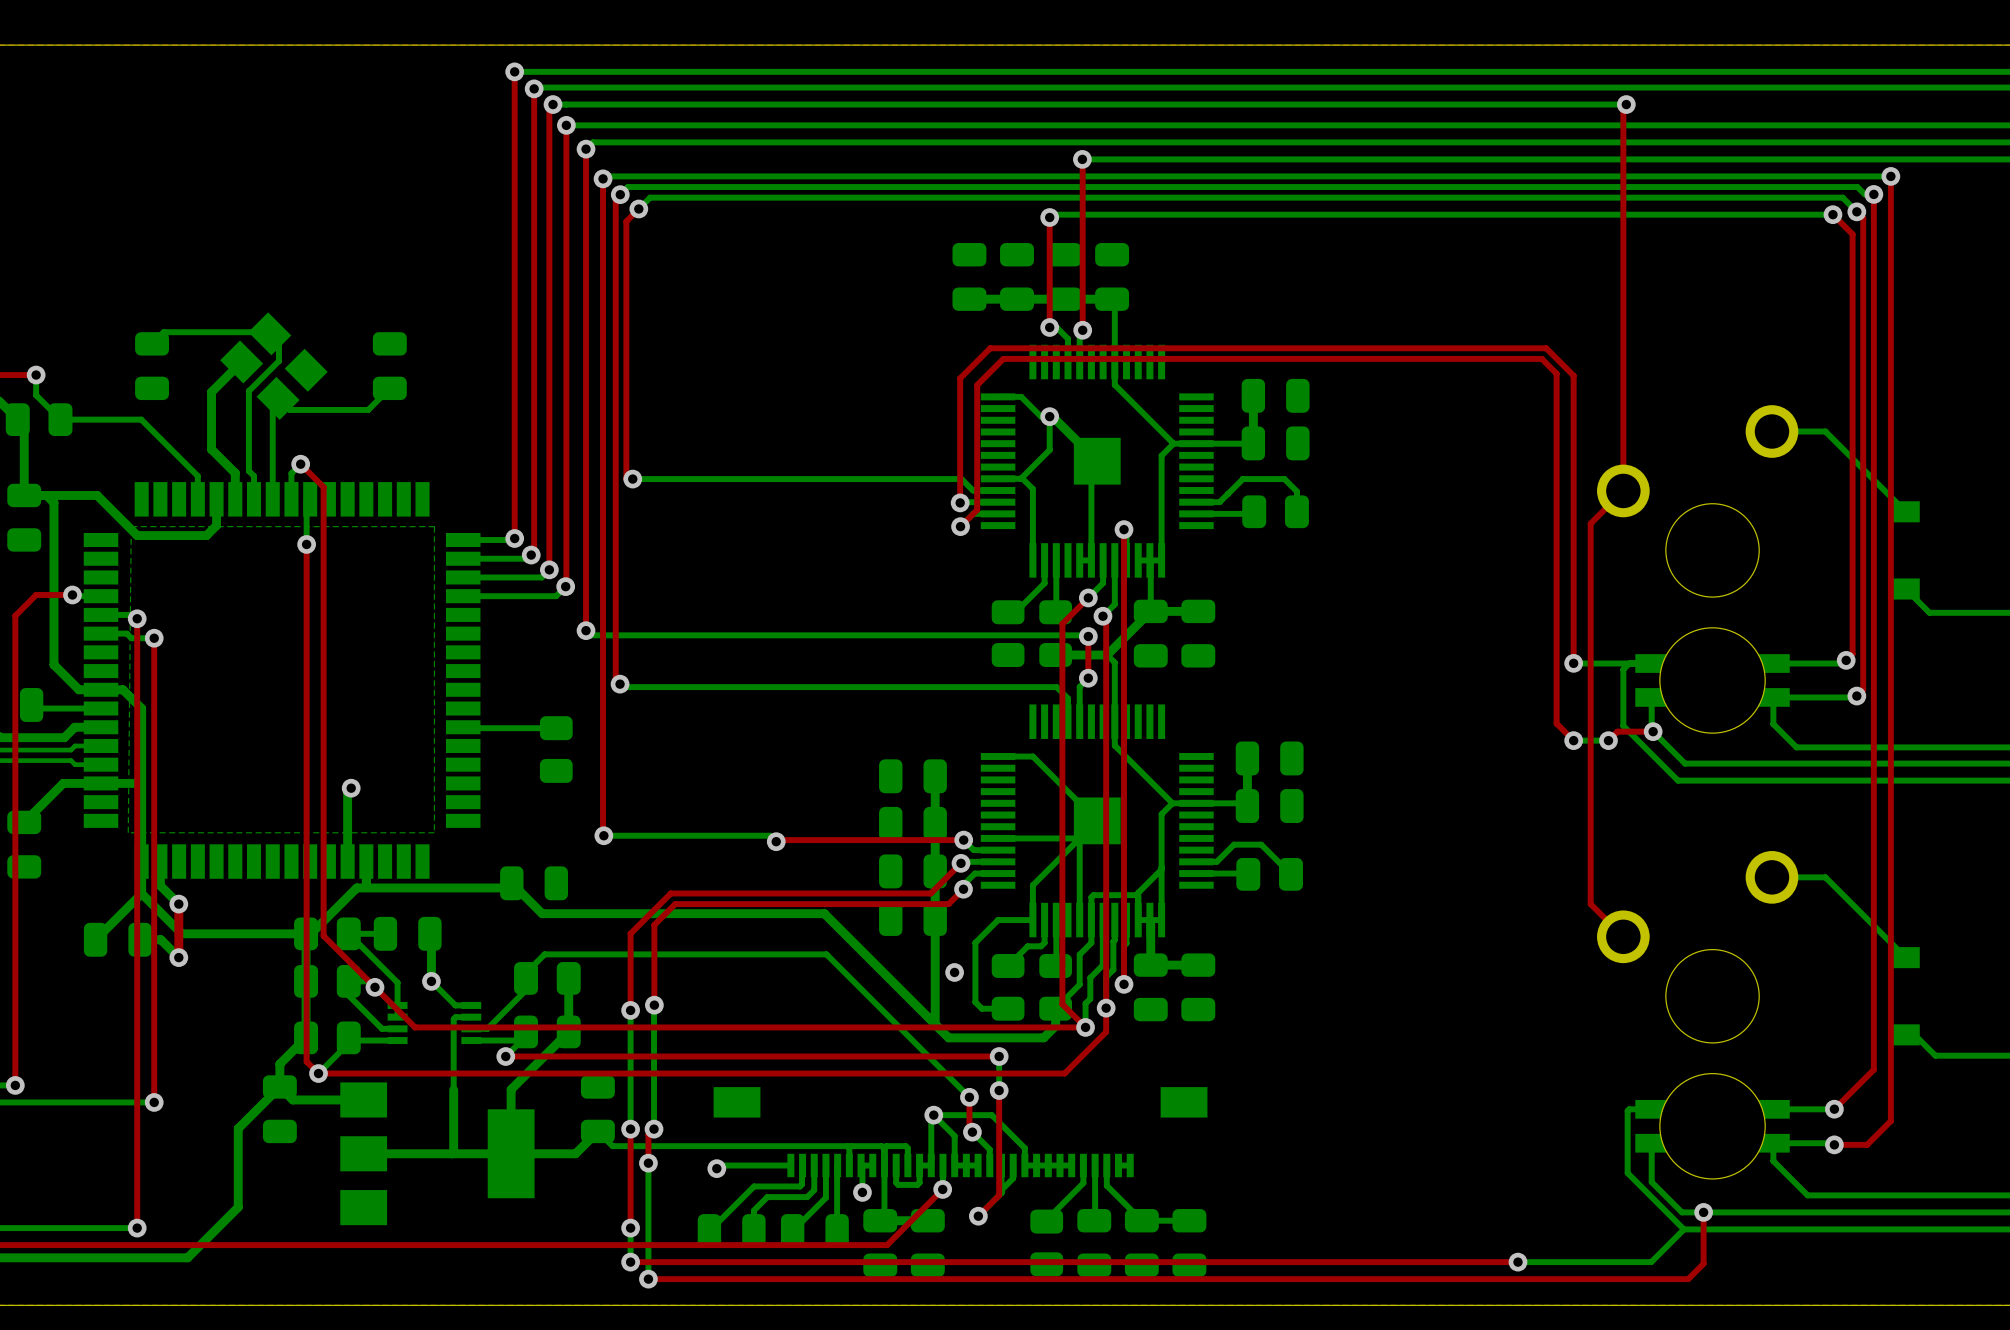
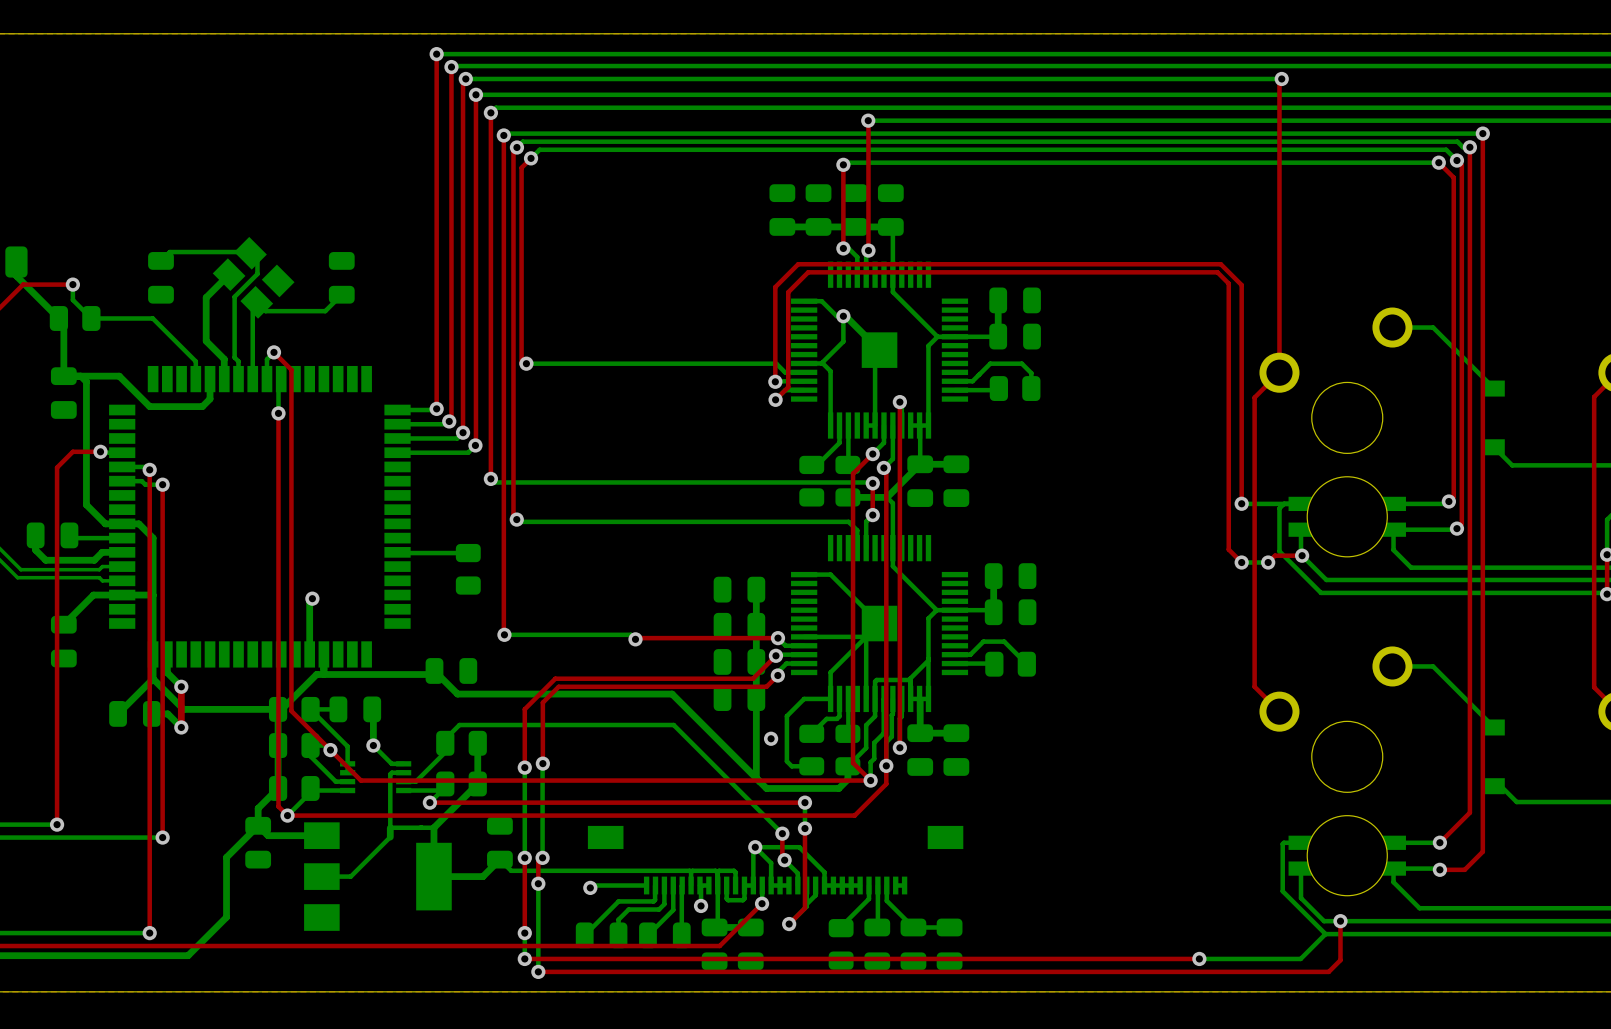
bottom zone outline: (131, 526) (128, 832) (434, 832) (434, 526) (131, 526) -> none
bottom track: none -> (390, 827) (433, 827)
bottom track: (453, 1101) (452, 1153) -> (390, 837) (350, 876)
bottom track: (363, 1153) (511, 1153) -> none

